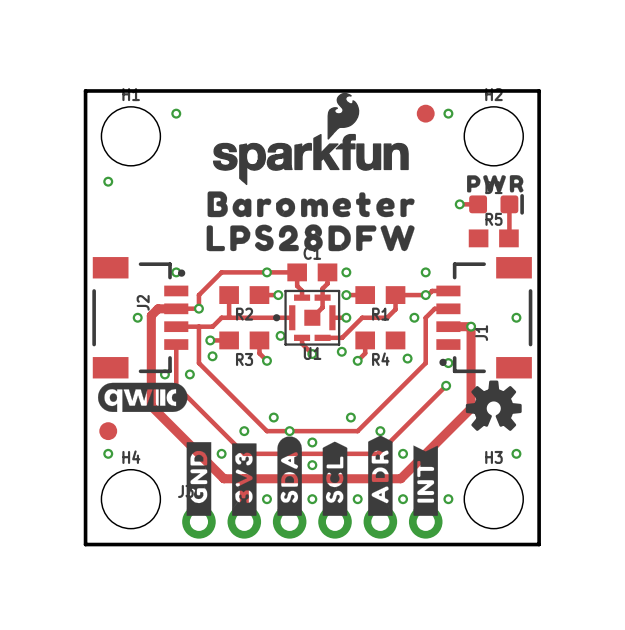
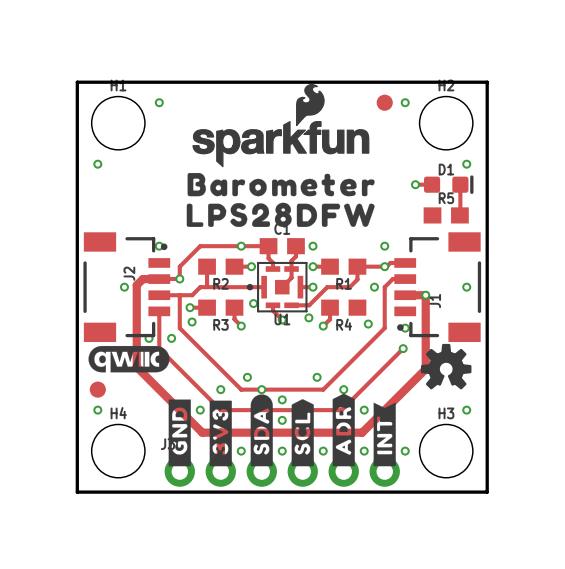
drawing: [467, 175, 524, 193] -> none

